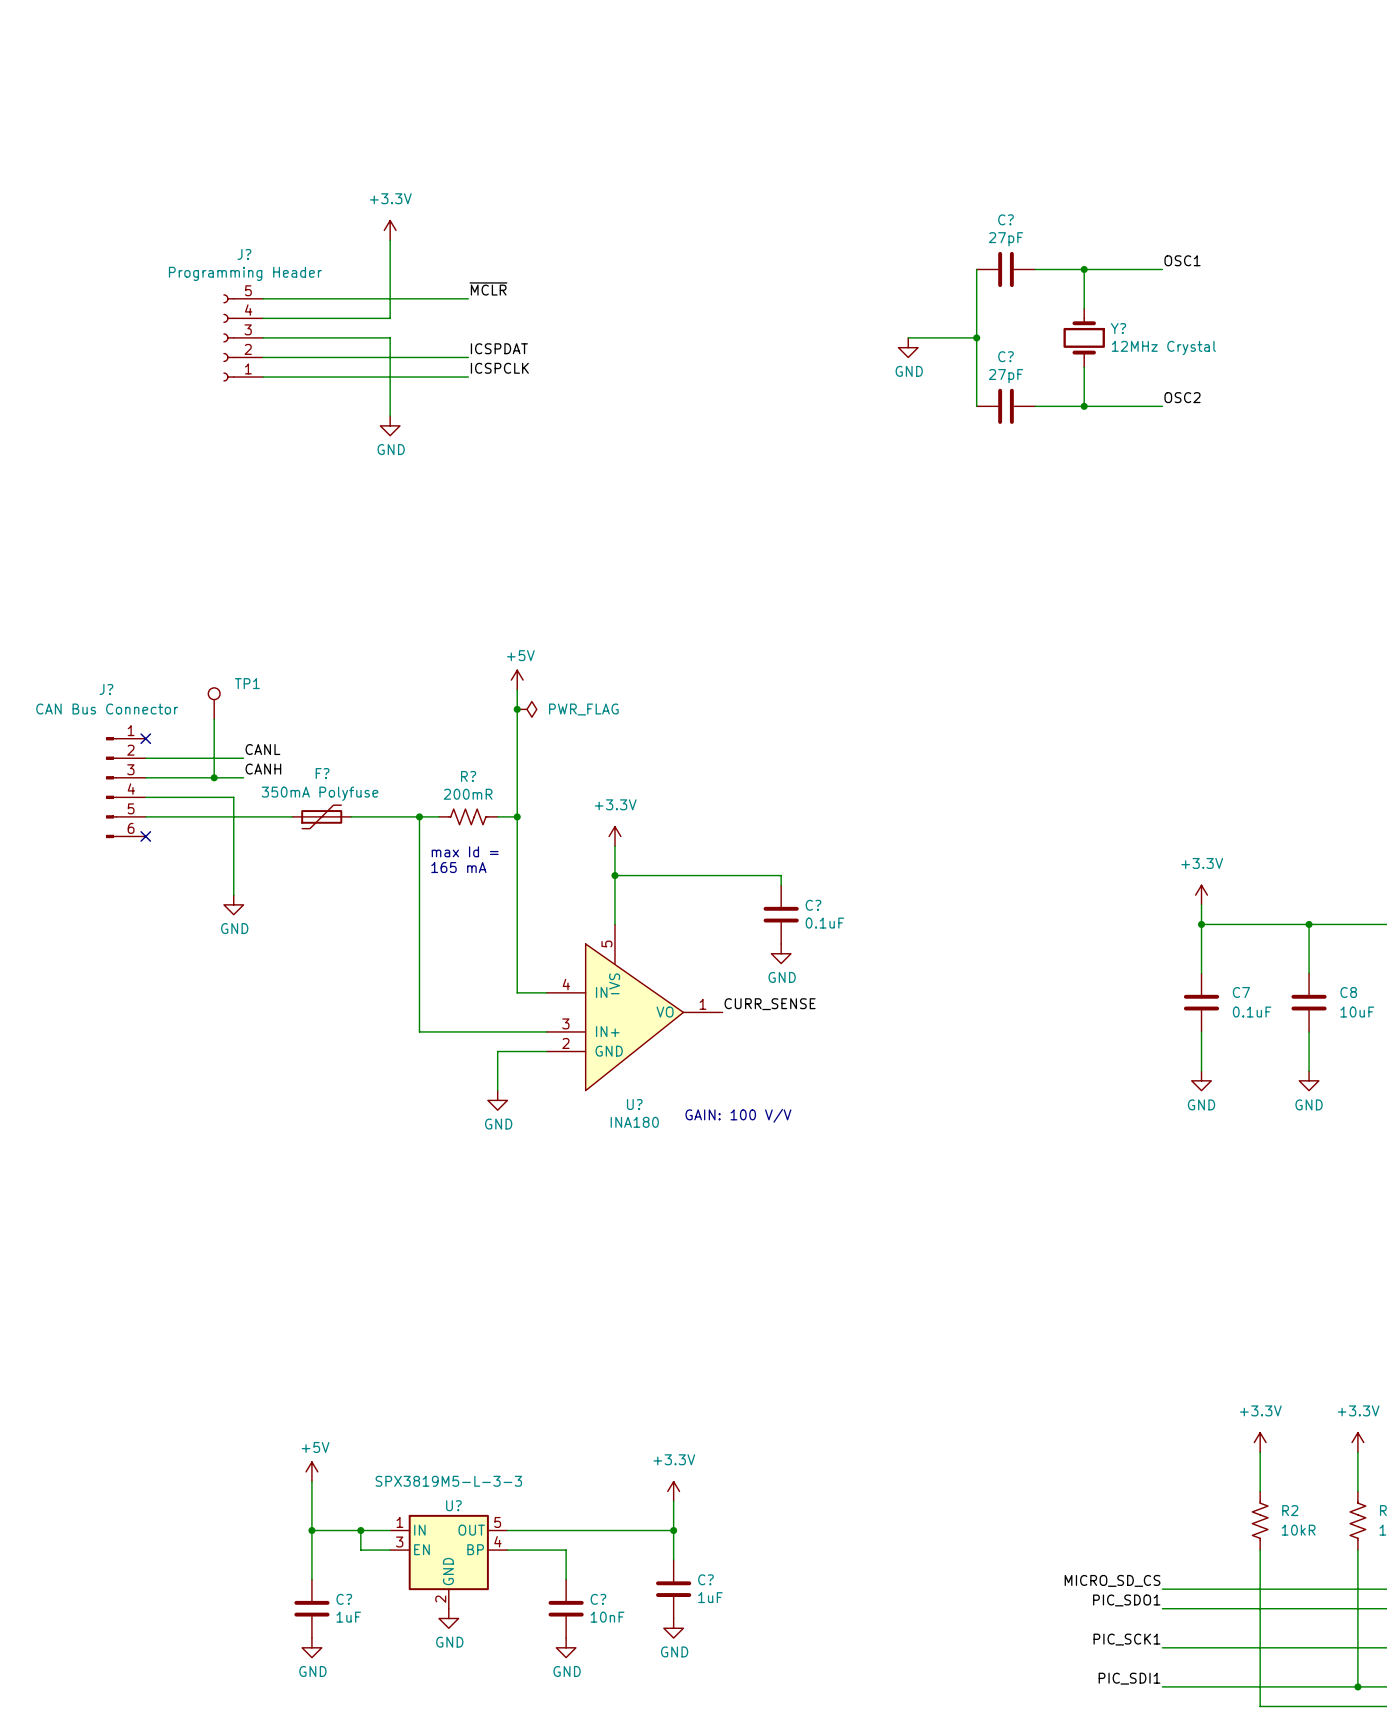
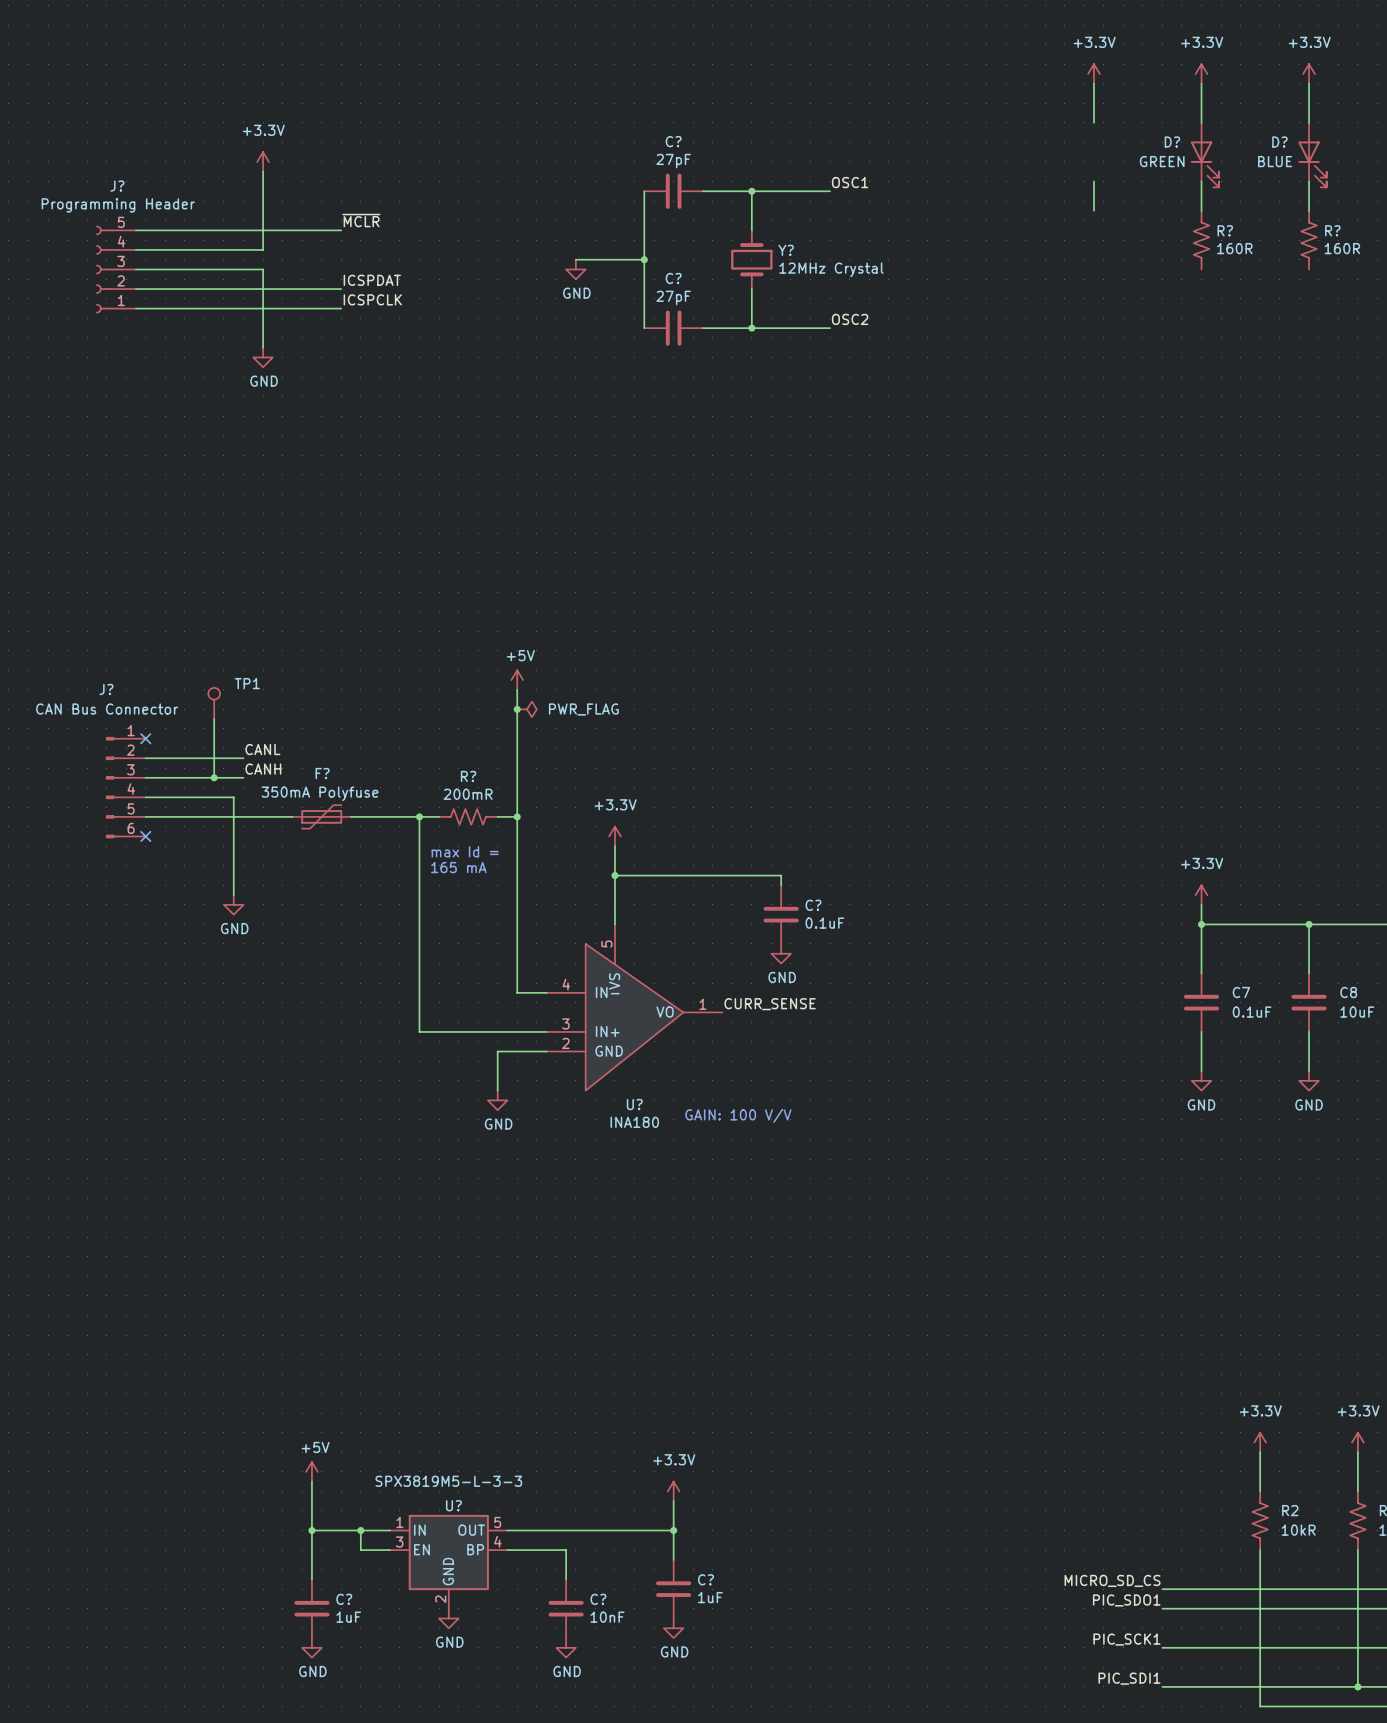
power symbol: none -> +3.3V (1093, 73)
power symbol: none -> +3.3V (1201, 73)
power symbol: none -> +3.3V (1309, 73)
wire: none -> (1201, 83) (1201, 122)
wire: none -> (1309, 83) (1309, 122)
D?: none -> GREEN (1204, 155)
D?: none -> BLUE (1312, 155)
wire: none -> (1093, 181) (1093, 210)
wire: none -> (1201, 181) (1201, 210)
wire: none -> (1309, 181) (1309, 210)
label: none -> OSC1 (850, 182)
wire: none -> (644, 191) (644, 328)
C?: none -> 27pF (673, 191)
wire: none -> (702, 191) (830, 191)
wire: none -> (751, 191) (751, 230)
junction: none -> (751, 191)
power symbol position: +3.3V (390, 230) -> +3.3V (263, 161)
wire: (390, 240) (390, 318) (263, 318) -> (263, 171) (263, 249) (135, 249)
R?: none -> 160R (1201, 240)
R?: none -> 160R (1309, 240)
wire: none -> (575, 259) (644, 259)
junction: none -> (644, 259)
Y?: none -> 12MHz Crystal (751, 259)
label: OSC1 (1182, 260) -> none
power symbol: none -> GND (575, 269)
wire: (976, 269) (976, 406) -> none
C?: 27pF (1006, 269) -> none
wire: (1035, 269) (1162, 269) -> none
wire: (1084, 269) (1084, 308) -> (1093, 83) (1093, 122)
junction: (1084, 269) -> none
label position: ~{MCLR} (488, 288) -> ~{MCLR} (361, 220)
wire: none -> (751, 289) (751, 328)
wire: (263, 298) (468, 298) -> (135, 230) (341, 230)
label: none -> OSC2 (850, 319)
C?: none -> 27pF (673, 328)
wire: none -> (702, 328) (830, 328)
junction: none -> (751, 328)
J? position: (243, 337) -> (116, 269)
wire: (263, 337) (390, 337) (390, 416) -> (135, 269) (263, 269) (263, 347)
wire: (908, 337) (976, 337) -> none
junction: (976, 337) -> none
Y?: 12MHz Crystal (1084, 337) -> none
power symbol: GND (908, 347) -> none
label position: ICSPDAT (499, 348) -> ICSPDAT (372, 280)
wire: (263, 357) (468, 357) -> (135, 289) (341, 289)
power symbol: none -> GND (263, 357)
wire: (1084, 367) (1084, 406) -> none
label position: ICSPCLK (499, 368) -> ICSPCLK (372, 299)
wire: (263, 377) (468, 377) -> (135, 308) (341, 308)
label: OSC2 (1182, 397) -> none
C?: 27pF (1006, 406) -> none
wire: (1035, 406) (1162, 406) -> none
junction: (1084, 406) -> none
power symbol: GND (390, 425) -> none

